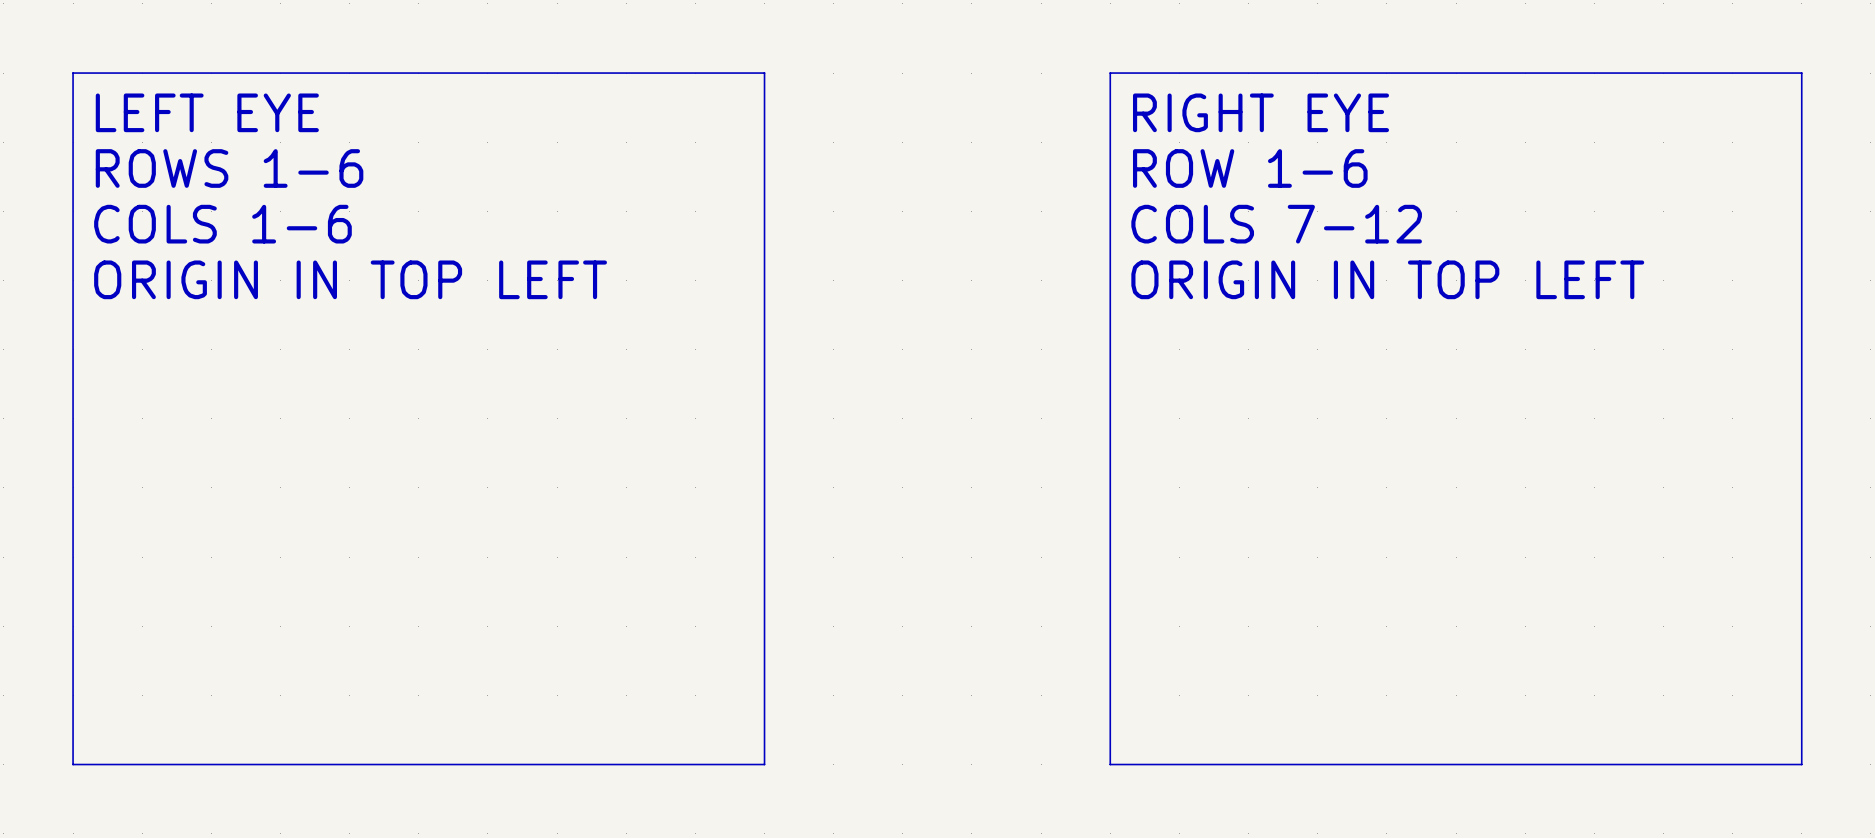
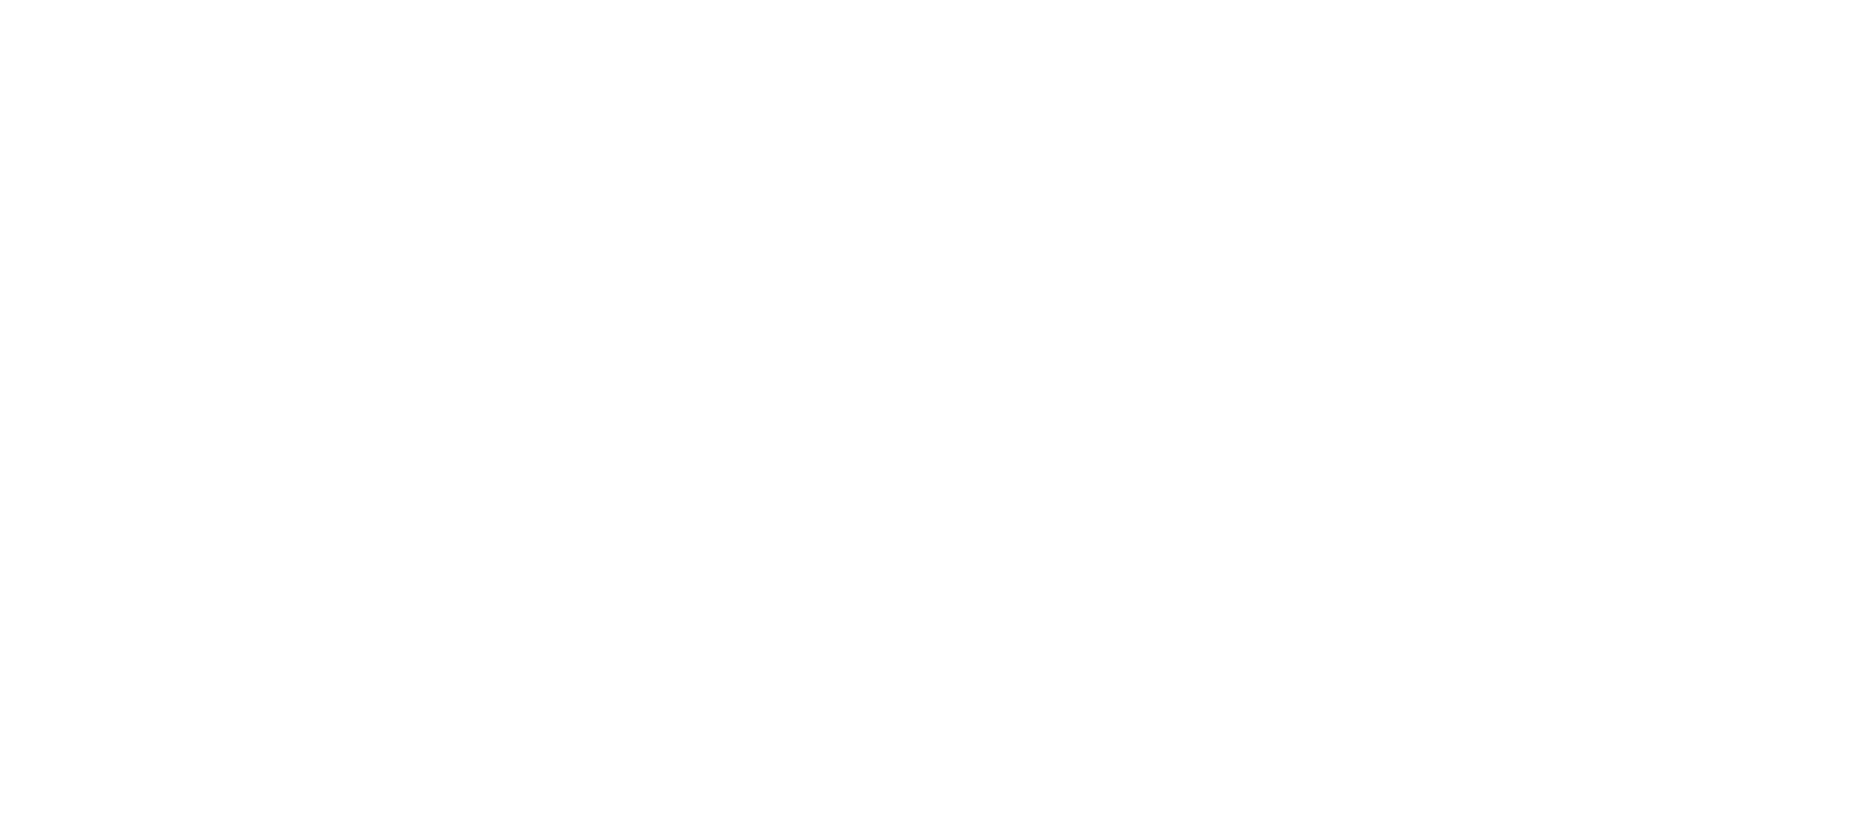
line: (73, 73) (764, 73) (764, 764) (73, 764) (73, 73) -> none
line: (1110, 73) (1801, 73) (1801, 764) (1110, 764) (1110, 73) -> none
text: LEFT EYE (207, 112) -> none
text: RIGHT EYE (1261, 112) -> none
text: ROWS 1-6 (229, 168) -> none
text: ROW 1-6 (1250, 168) -> none
text: COLS 1-6 (222, 224) -> none
text: COLS 7-12 (1276, 224) -> none
text: ORIGIN IN TOP LEFT (350, 279) -> none
text: ORIGIN IN TOP LEFT (1387, 279) -> none

